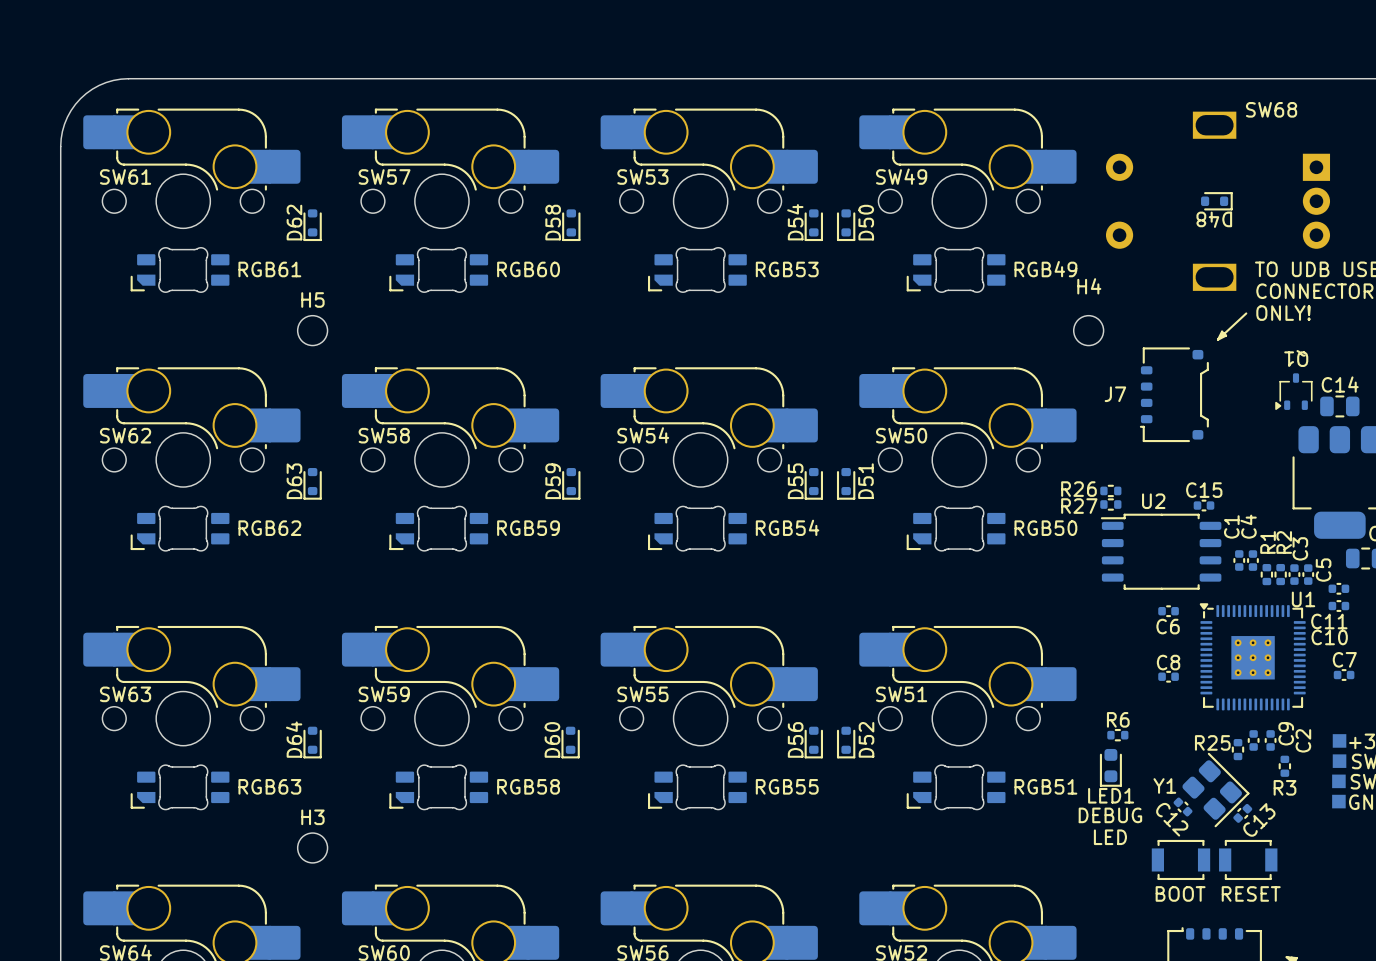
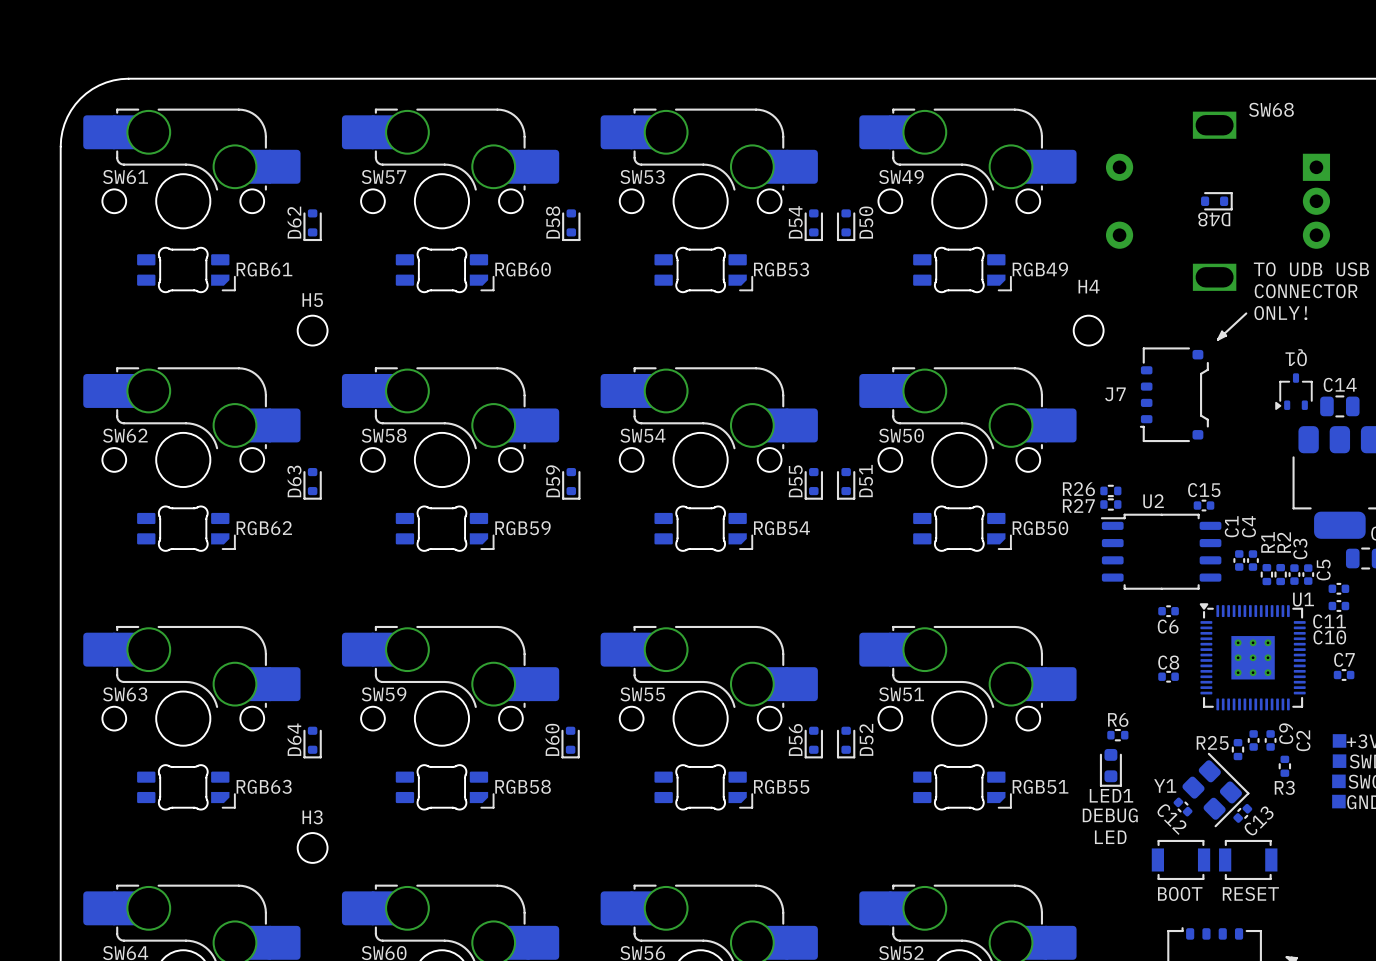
RGB61 footprint: [130, 247, 230, 293] -> [137, 247, 236, 293]
RGB60 footprint: [389, 247, 489, 293] -> [395, 247, 495, 293]
RGB53 footprint: [647, 247, 747, 293] -> [654, 247, 754, 293]
RGB49 footprint: [906, 247, 1006, 293] -> [913, 247, 1012, 293]
RGB62 footprint: [130, 505, 230, 552] -> [137, 505, 236, 552]
RGB59 footprint: [389, 505, 489, 552] -> [395, 505, 495, 552]
RGB54 footprint: [647, 505, 747, 552] -> [654, 505, 754, 552]
RGB50 footprint: [906, 505, 1006, 552] -> [913, 505, 1012, 552]
RGB63 footprint: [130, 764, 230, 811] -> [137, 764, 236, 811]
RGB58 footprint: [389, 764, 489, 811] -> [395, 764, 495, 811]
RGB55 footprint: [647, 764, 747, 811] -> [654, 764, 754, 811]
RGB51 footprint: [906, 764, 1006, 811] -> [913, 764, 1012, 811]

